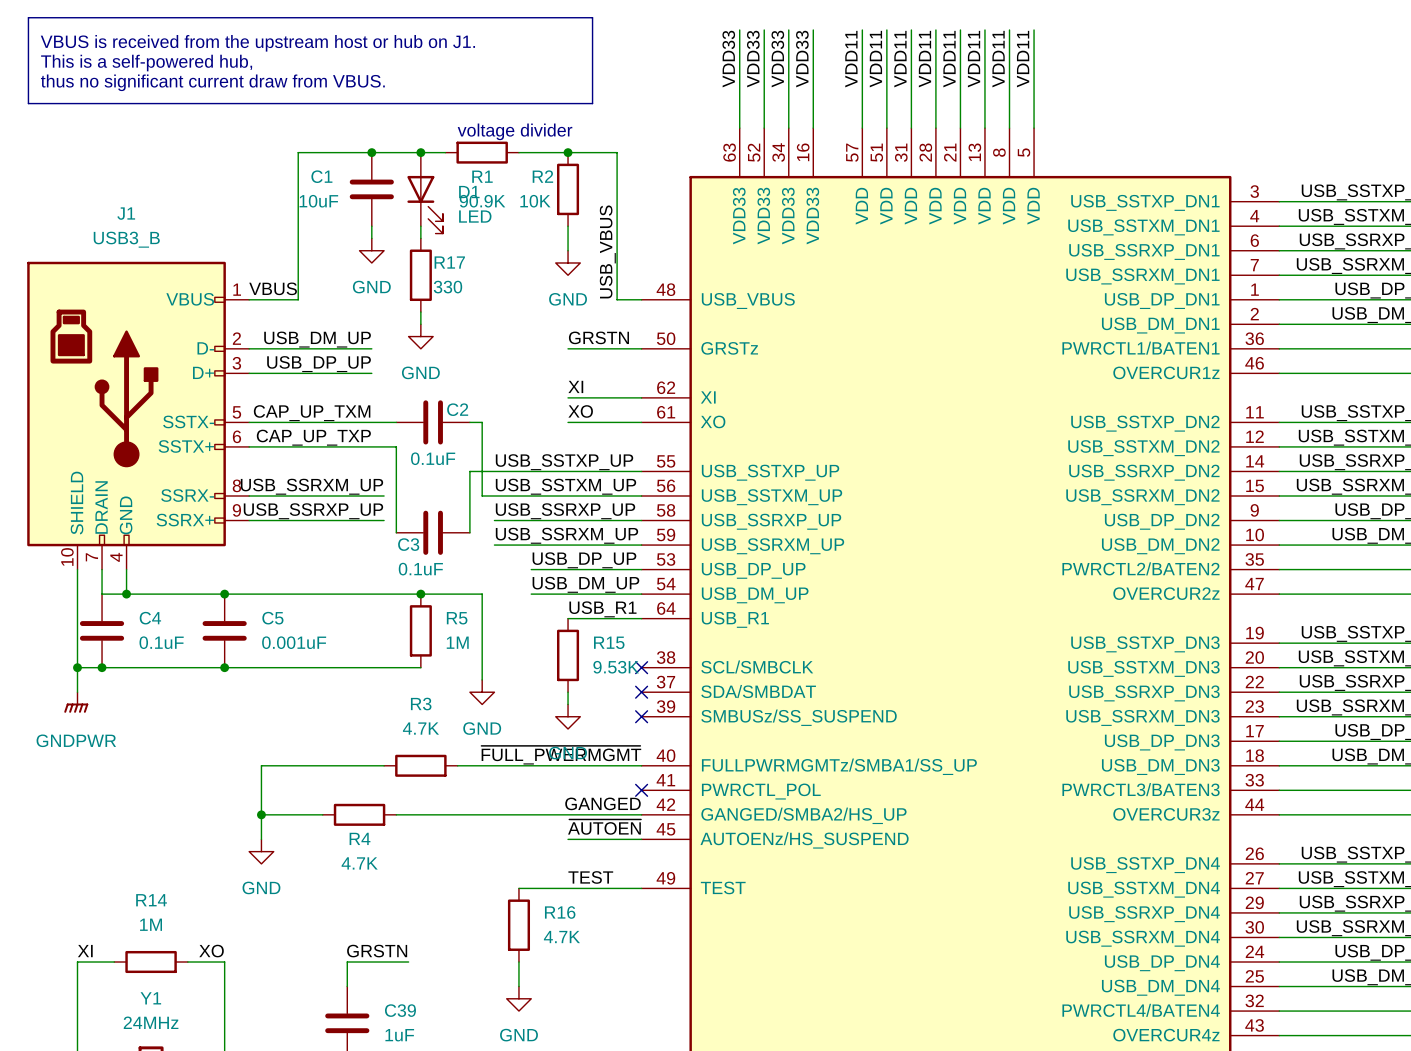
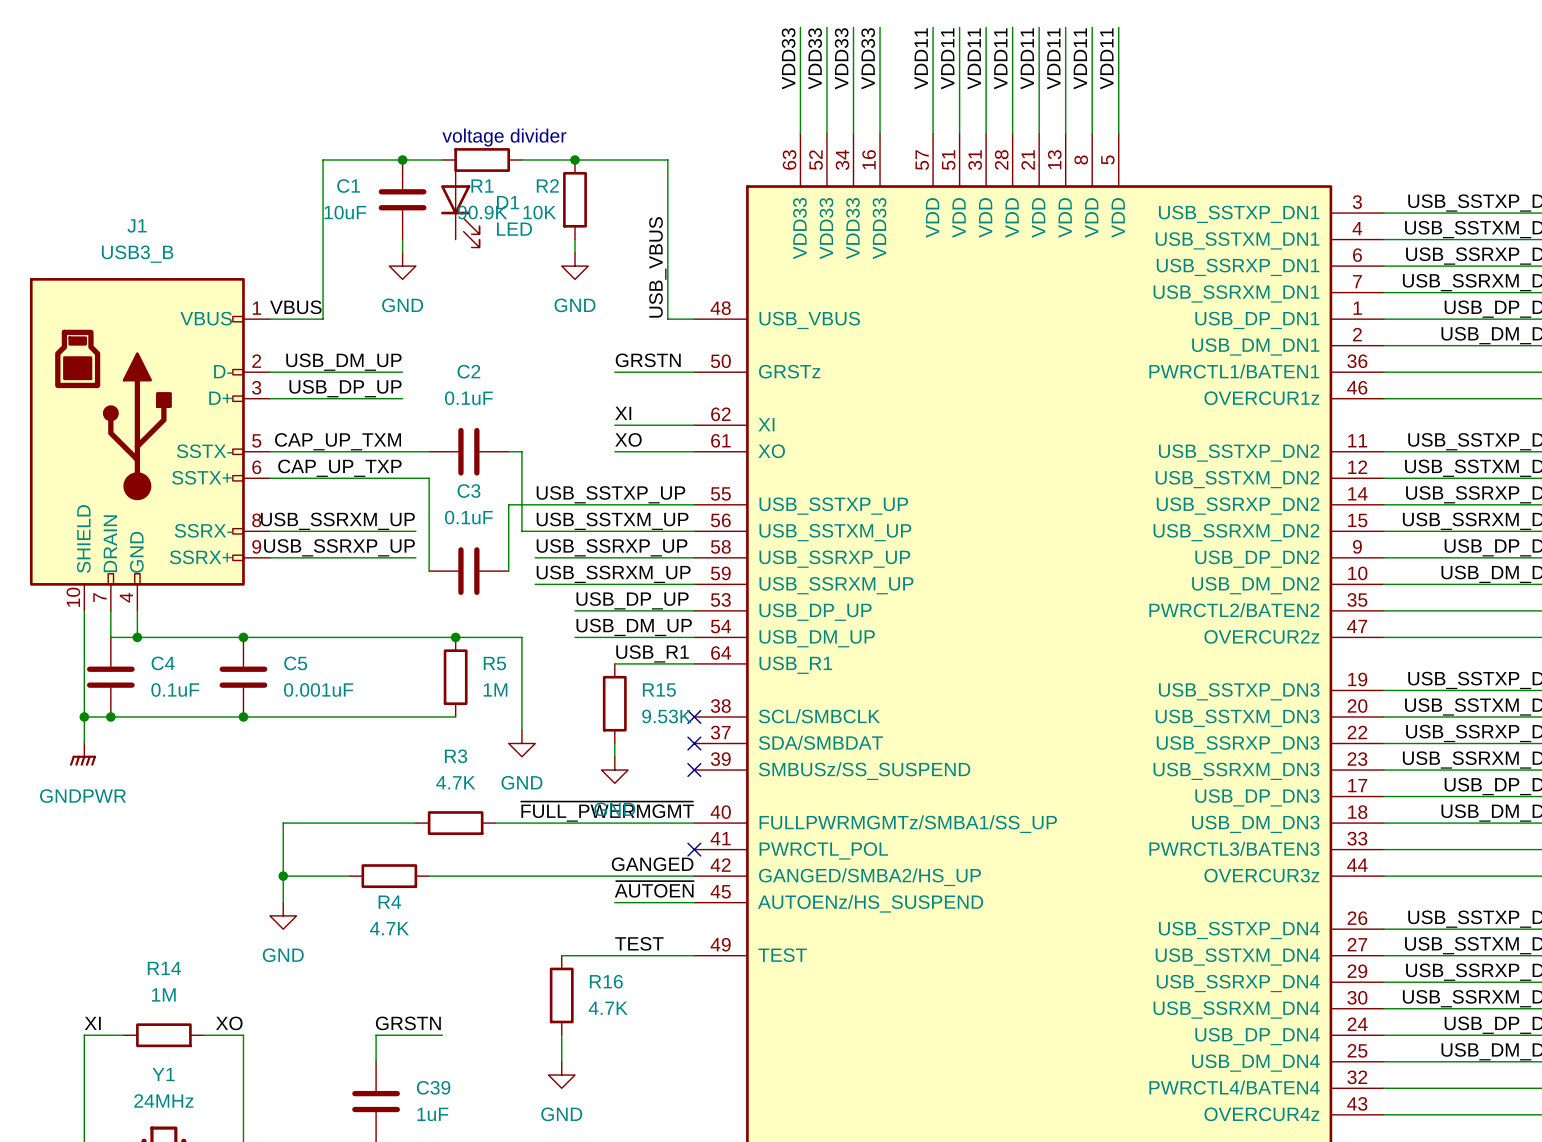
line: (28, 17) (592, 17) (592, 103) (28, 103) (28, 17) -> none
text: VBUS is received from the upstream host or hub on J1. (257, 43) -> none
text: This is a self-powered hub, (146, 63) -> none
text: thus no significant current draw from VBUS. (212, 82) -> none
text position: voltage divider (515, 131) -> voltage divider (504, 137)
wire: (408, 152) (445, 152) -> (521, 160) (561, 160)
junction: (420, 152) -> none
R1 position: (482, 152) -> (482, 160)
junction position: (568, 152) -> (575, 160)
R2 position: (568, 189) -> (575, 199)
wire: (420, 226) (420, 238) -> (575, 239) (575, 252)
wire: (568, 226) (568, 250) -> none
power symbol position: GND (568, 262) -> GND (575, 266)
R17: 330 (420, 275) -> none
wire: (420, 312) (420, 324) -> none
power symbol: GND (420, 336) -> none
C2 name position: C2 (457, 409) -> C2 (468, 371)
C2 value position: 0.1uF (433, 458) -> 0.1uF (468, 398)
C3 name position: C3 (408, 544) -> C3 (468, 491)
C3 value position: 0.1uF (420, 569) -> 0.1uF (468, 517)

